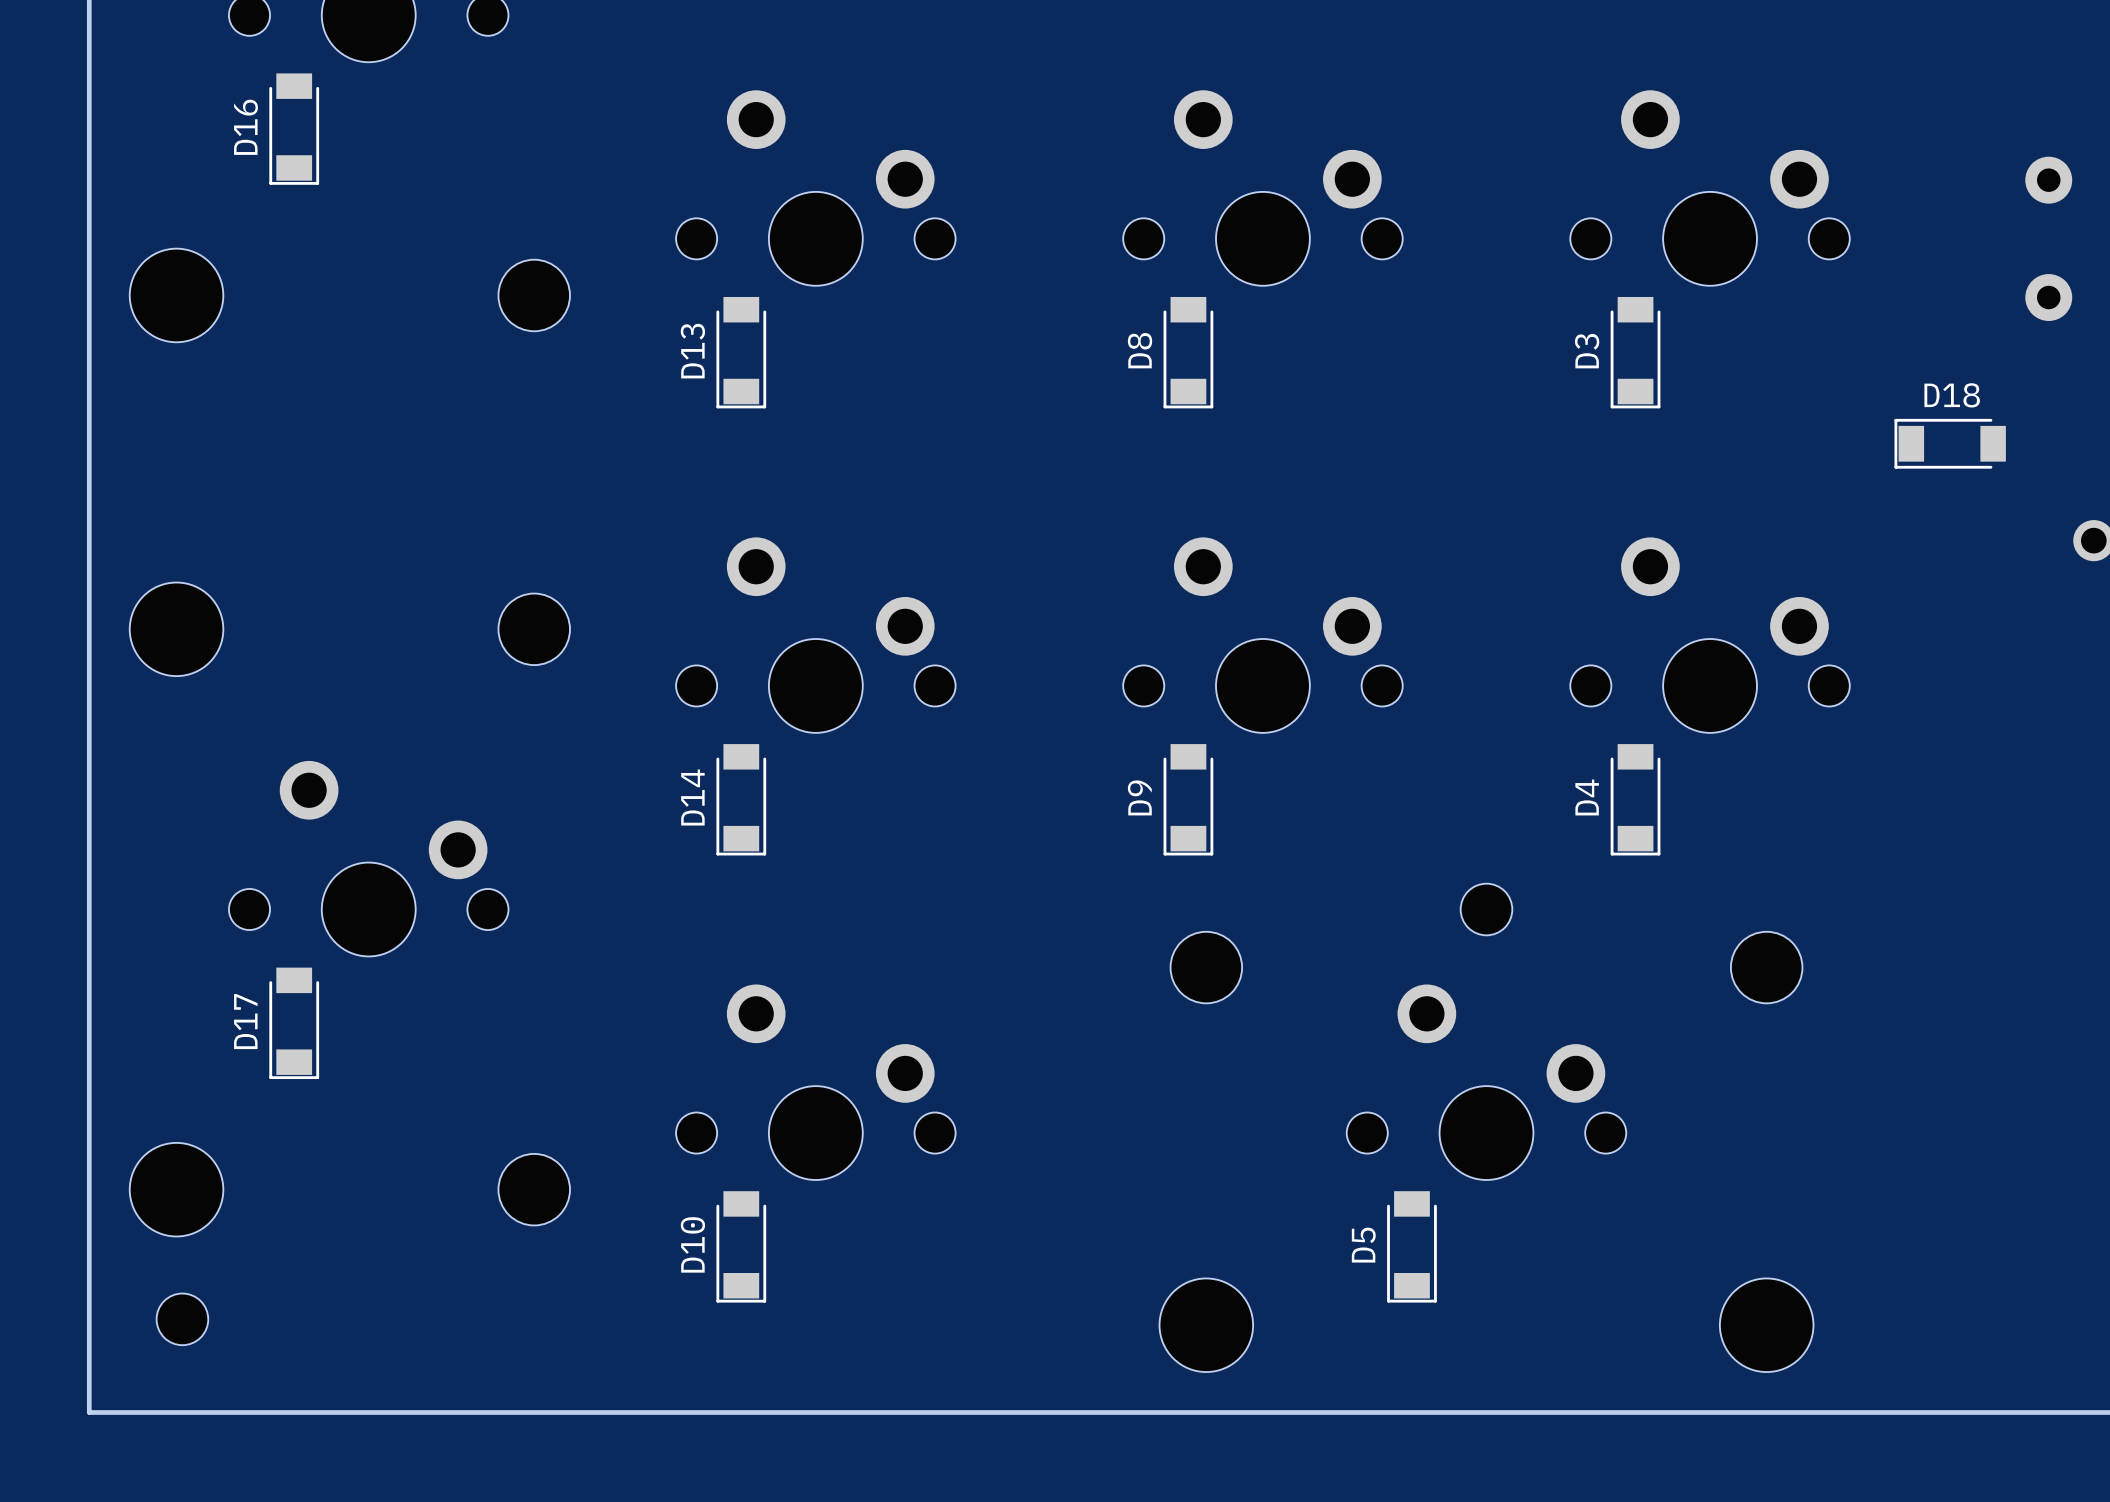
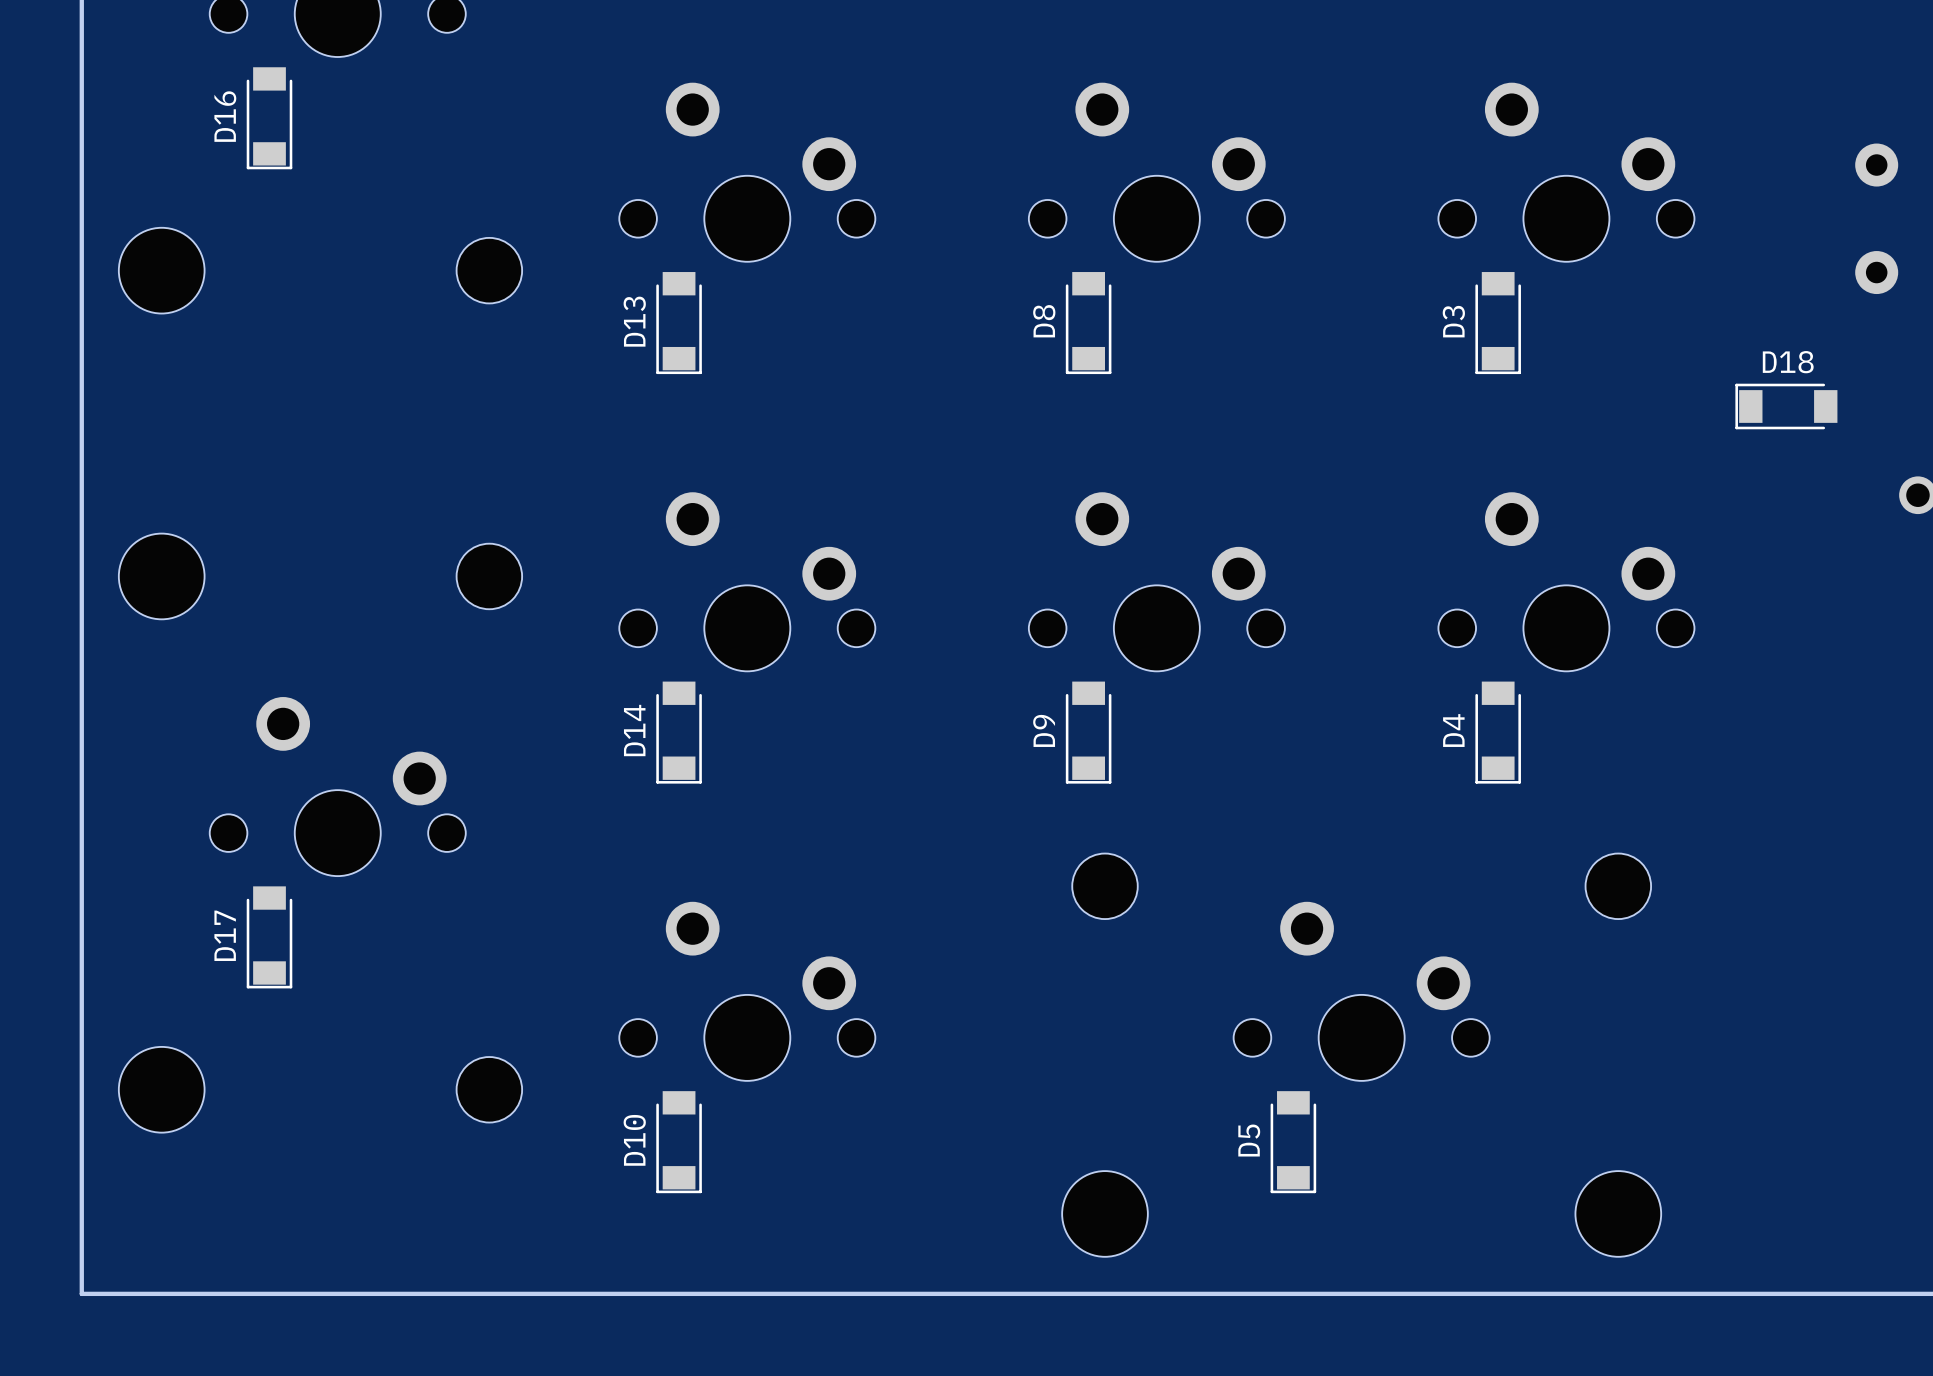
part: (1486, 909) -> none
part: (182, 1319) -> none

